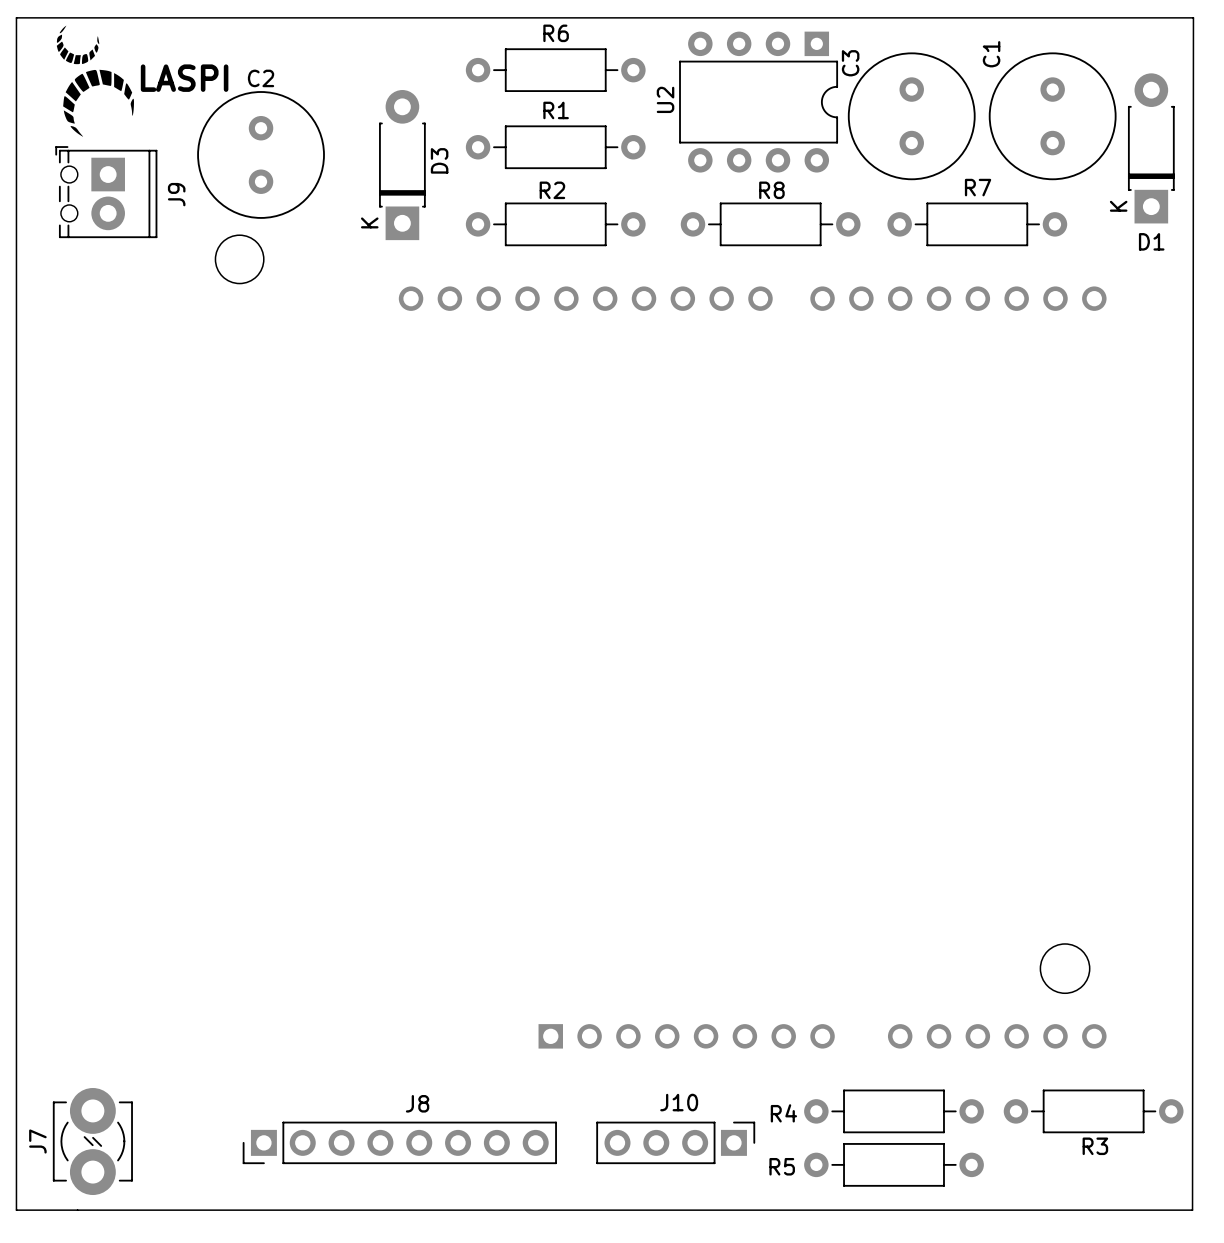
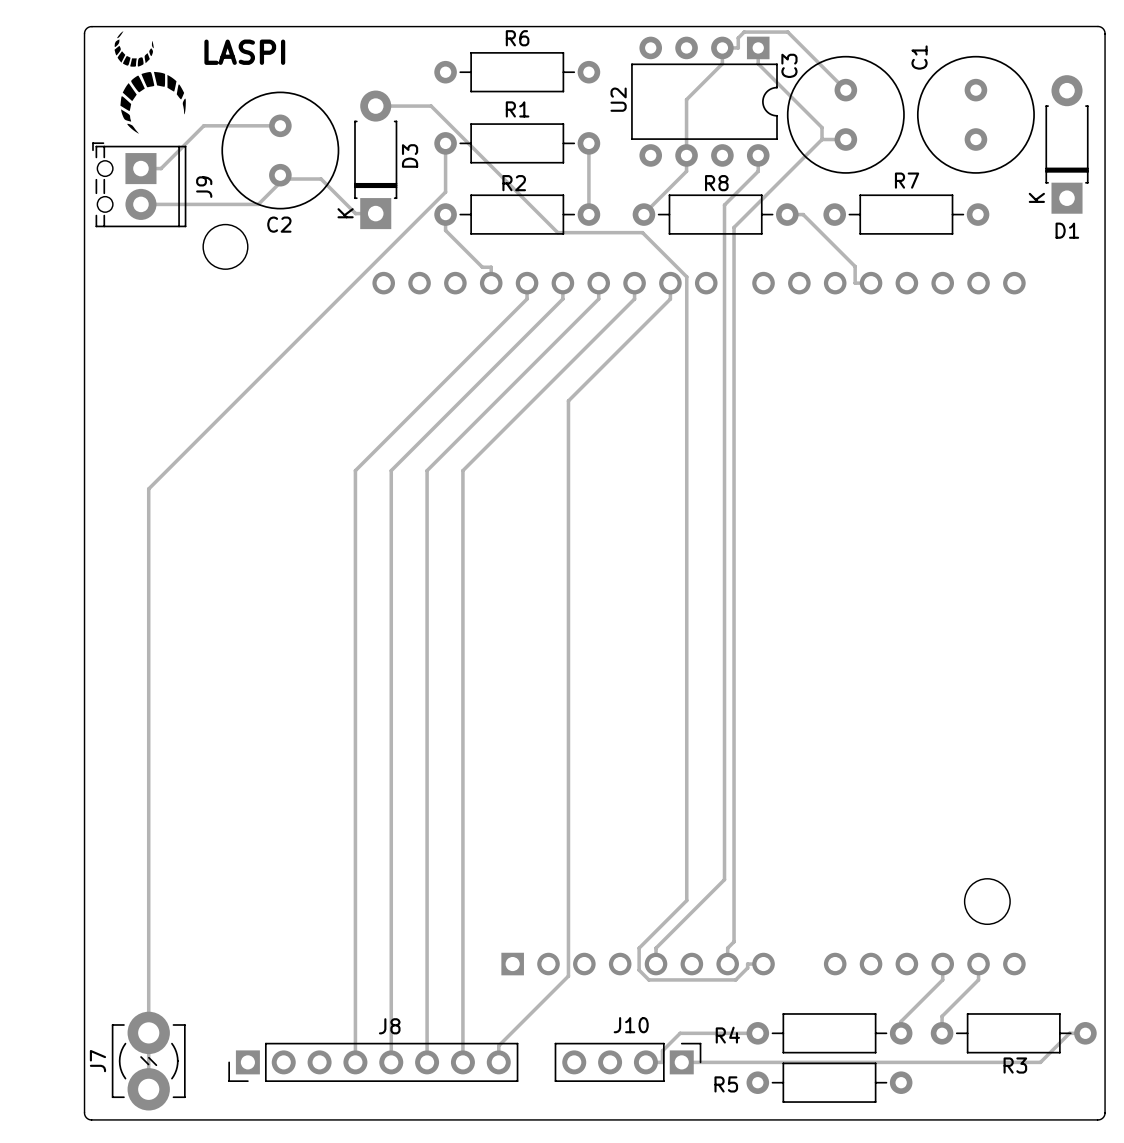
board edge: (16, 17) (16, 1210) (1192, 1210) (1193, 17) (16, 17) -> (1097, 26) (91, 26) (86, 29) (84, 33) (84, 1113) (87, 1118) (91, 1119) (1098, 1119) (1103, 1117) (1105, 1112) (1105, 33) (1103, 28) (1097, 26)
track: none -> (758, 47) (758, 63) (822, 127) (822, 139)
text position: LASPI (184, 78) -> LASPI (244, 52)
C2 name position: C2 (261, 78) -> C2 (279, 224)
drawing position: (95, 81) -> (150, 82)
track: none -> (845, 90) (787, 32) (744, 32) (738, 38) (738, 47) (722, 47) (722, 63) (686, 99) (686, 171) (643, 214)
track: none -> (375, 106) (431, 106) (557, 232) (642, 232) (686, 276) (686, 900) (639, 948) (639, 970) (648, 979) (735, 979) (747, 968) (747, 964) (763, 964)
track: none -> (280, 125) (203, 125) (161, 168) (140, 168)
track: none -> (822, 139) (734, 227) (734, 941) (727, 948) (727, 964)
track: none -> (822, 139) (845, 139)
track: none -> (445, 143) (445, 192) (148, 488) (148, 1089)
track: none -> (588, 143) (588, 213)
C2 position: (261, 154) -> (280, 150)
track: none -> (758, 155) (758, 171) (724, 205) (724, 879) (656, 948) (656, 964)
track: none -> (283, 179) (321, 179) (355, 213) (375, 213)
track: none -> (283, 179) (258, 204) (140, 204)
J9 position: (106, 192) -> (139, 184)
track: none -> (445, 214) (445, 230) (482, 267) (491, 267) (491, 283)
track: none -> (787, 214) (803, 214) (855, 266) (855, 283) (871, 283)
track: none -> (527, 283) (527, 299) (355, 470) (355, 1062)
track: none -> (562, 283) (562, 299) (391, 470) (391, 1062)
track: none -> (598, 283) (598, 299) (427, 470) (427, 1062)
track: none -> (634, 283) (634, 299) (462, 470) (462, 1062)
track: none -> (670, 283) (670, 299) (568, 400) (568, 976) (498, 1045) (498, 1062)
track: none -> (942, 964) (942, 979) (901, 1021) (901, 1033)
track: none -> (978, 964) (978, 979) (942, 1016) (942, 1033)
track: none -> (757, 1033) (680, 1033) (662, 1050) (662, 1062) (645, 1062)
track: none -> (1085, 1033) (1069, 1033) (1040, 1062) (681, 1062)
J7 position: (92, 1141) -> (148, 1061)

